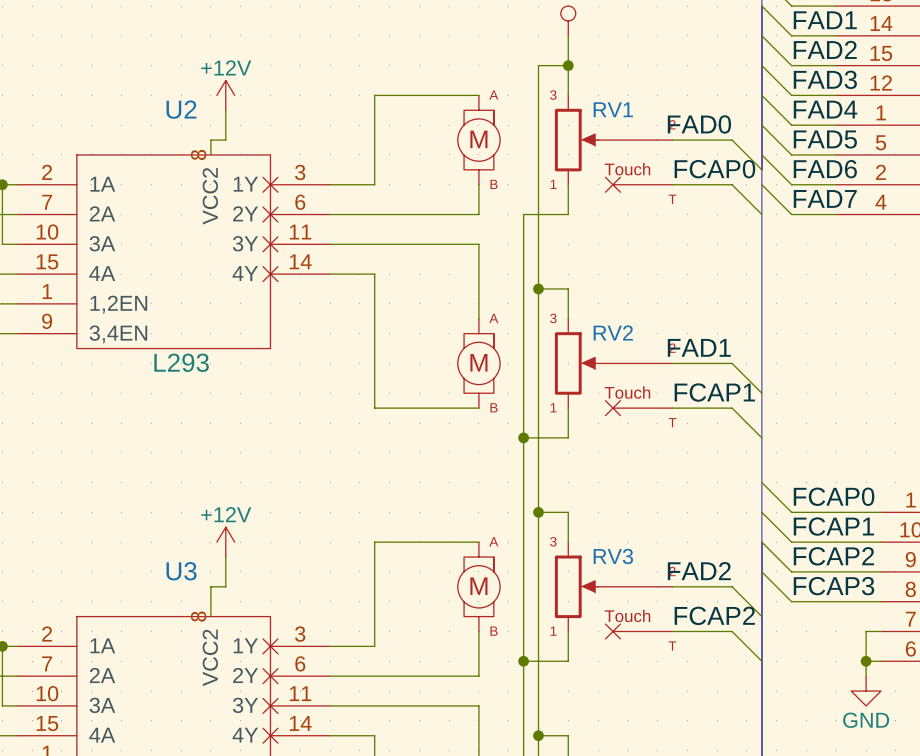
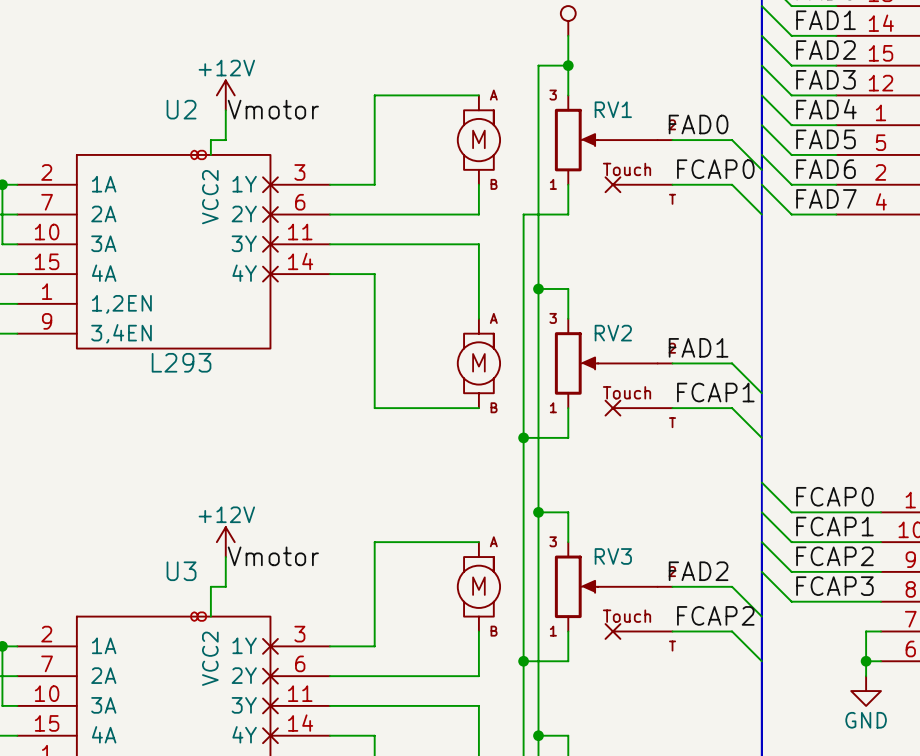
label: none -> Vmotor (273, 109)
label: none -> Vmotor (273, 556)

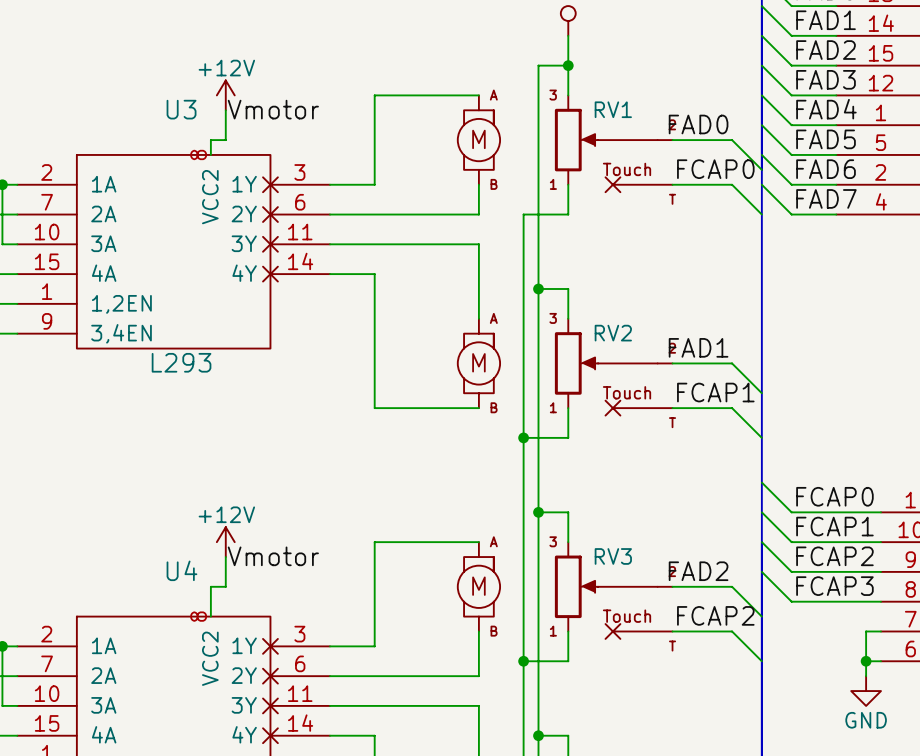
U2 name: U2 (181, 109) -> U3 (181, 109)
U3 name: U3 (181, 571) -> U4 (181, 570)

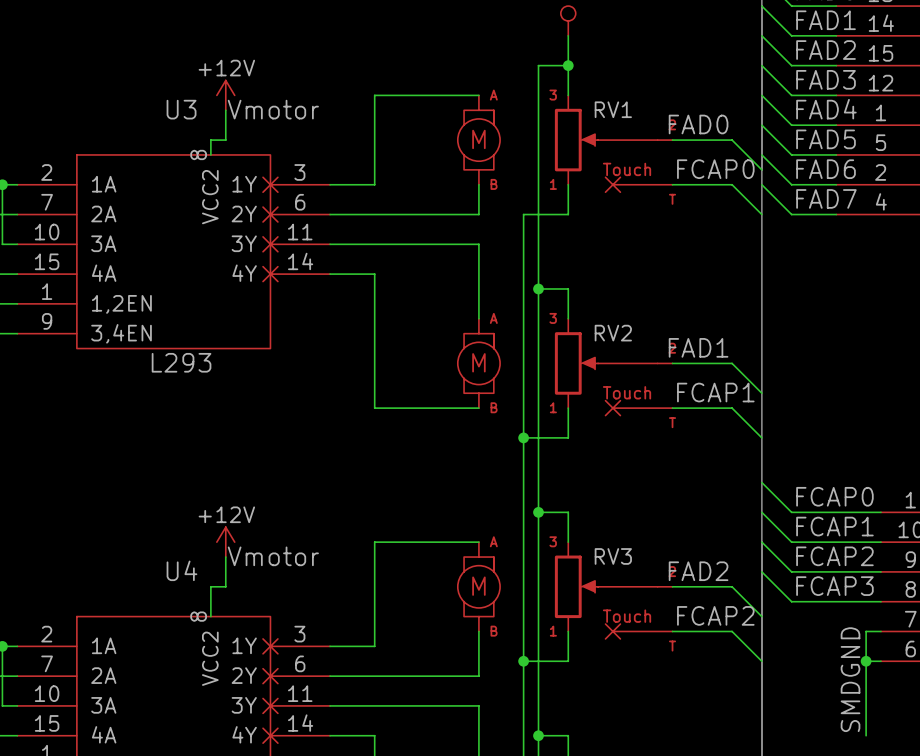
wire: none -> (866, 676) (866, 735)
label: none -> SMDGND (850, 679)
power symbol: GND (866, 691) -> none

